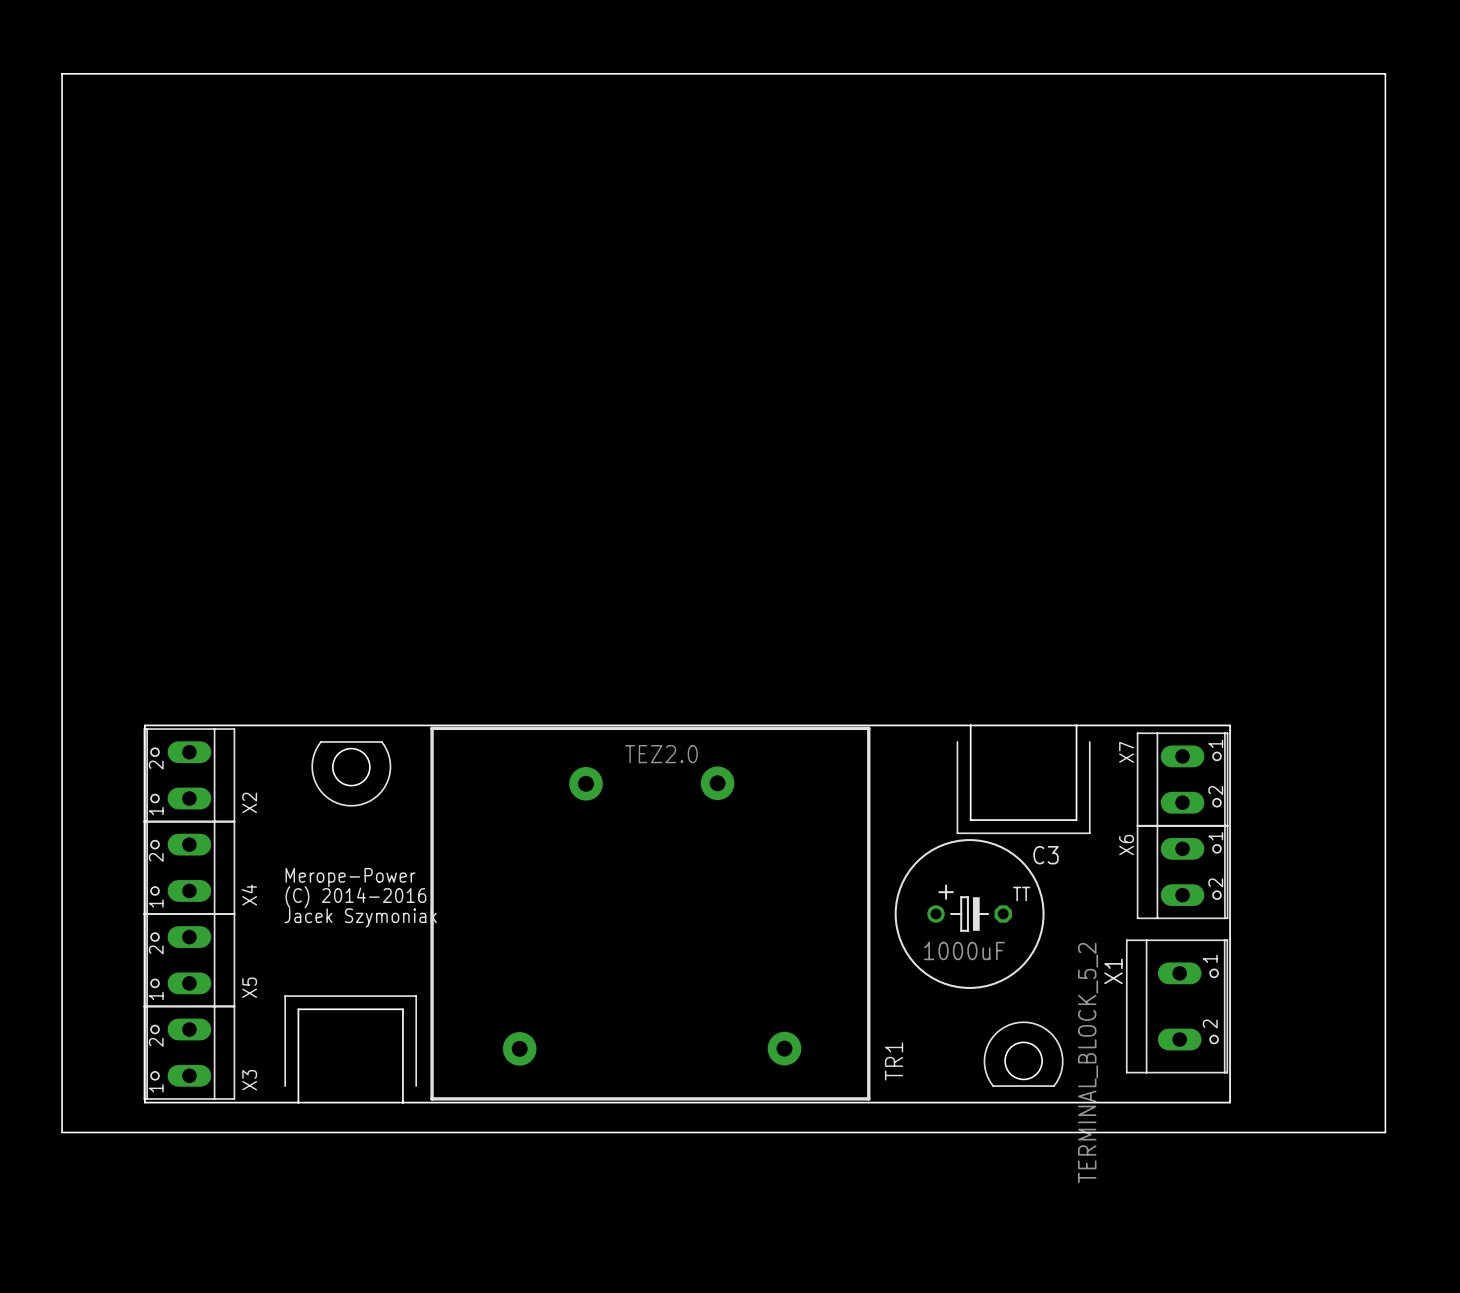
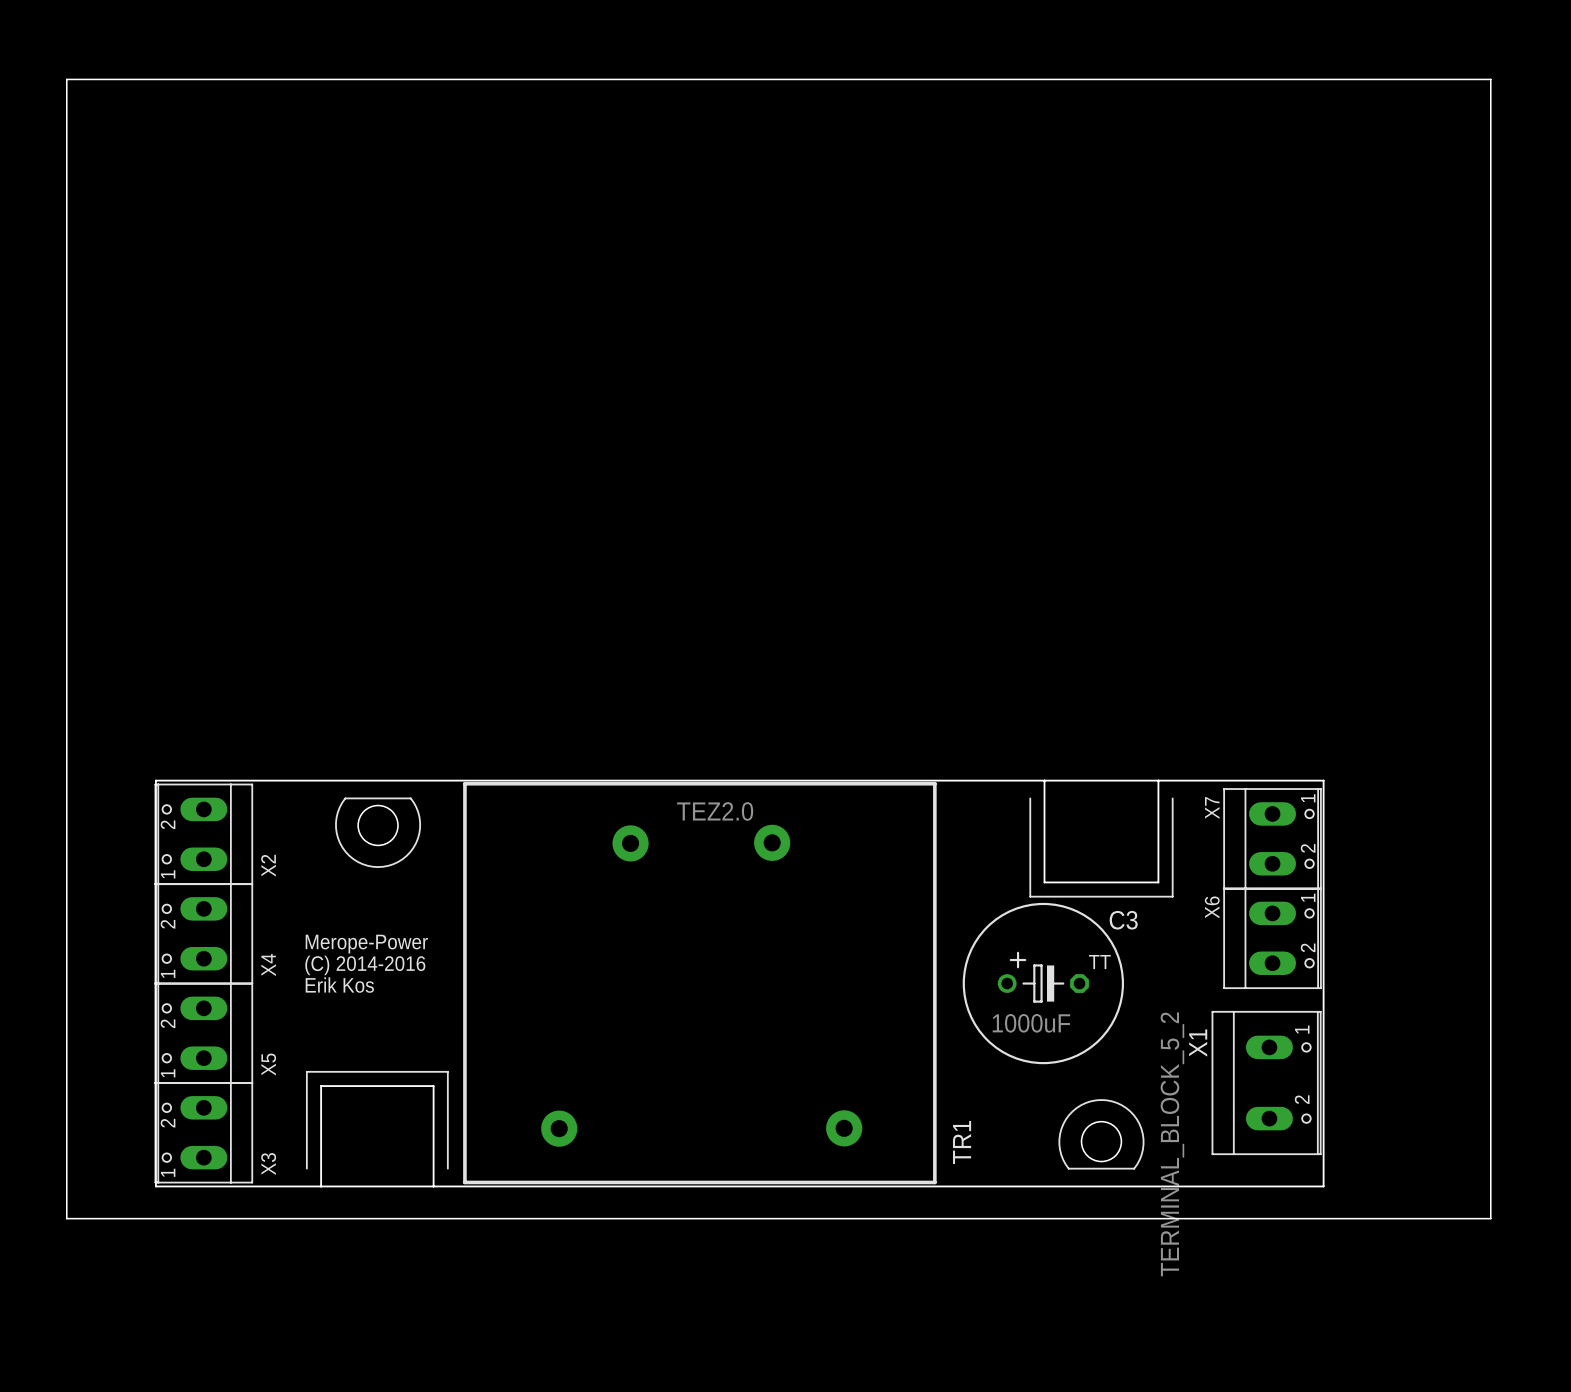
text: Jacek Szymoniak (360, 917) -> Erik Kos (339, 985)

